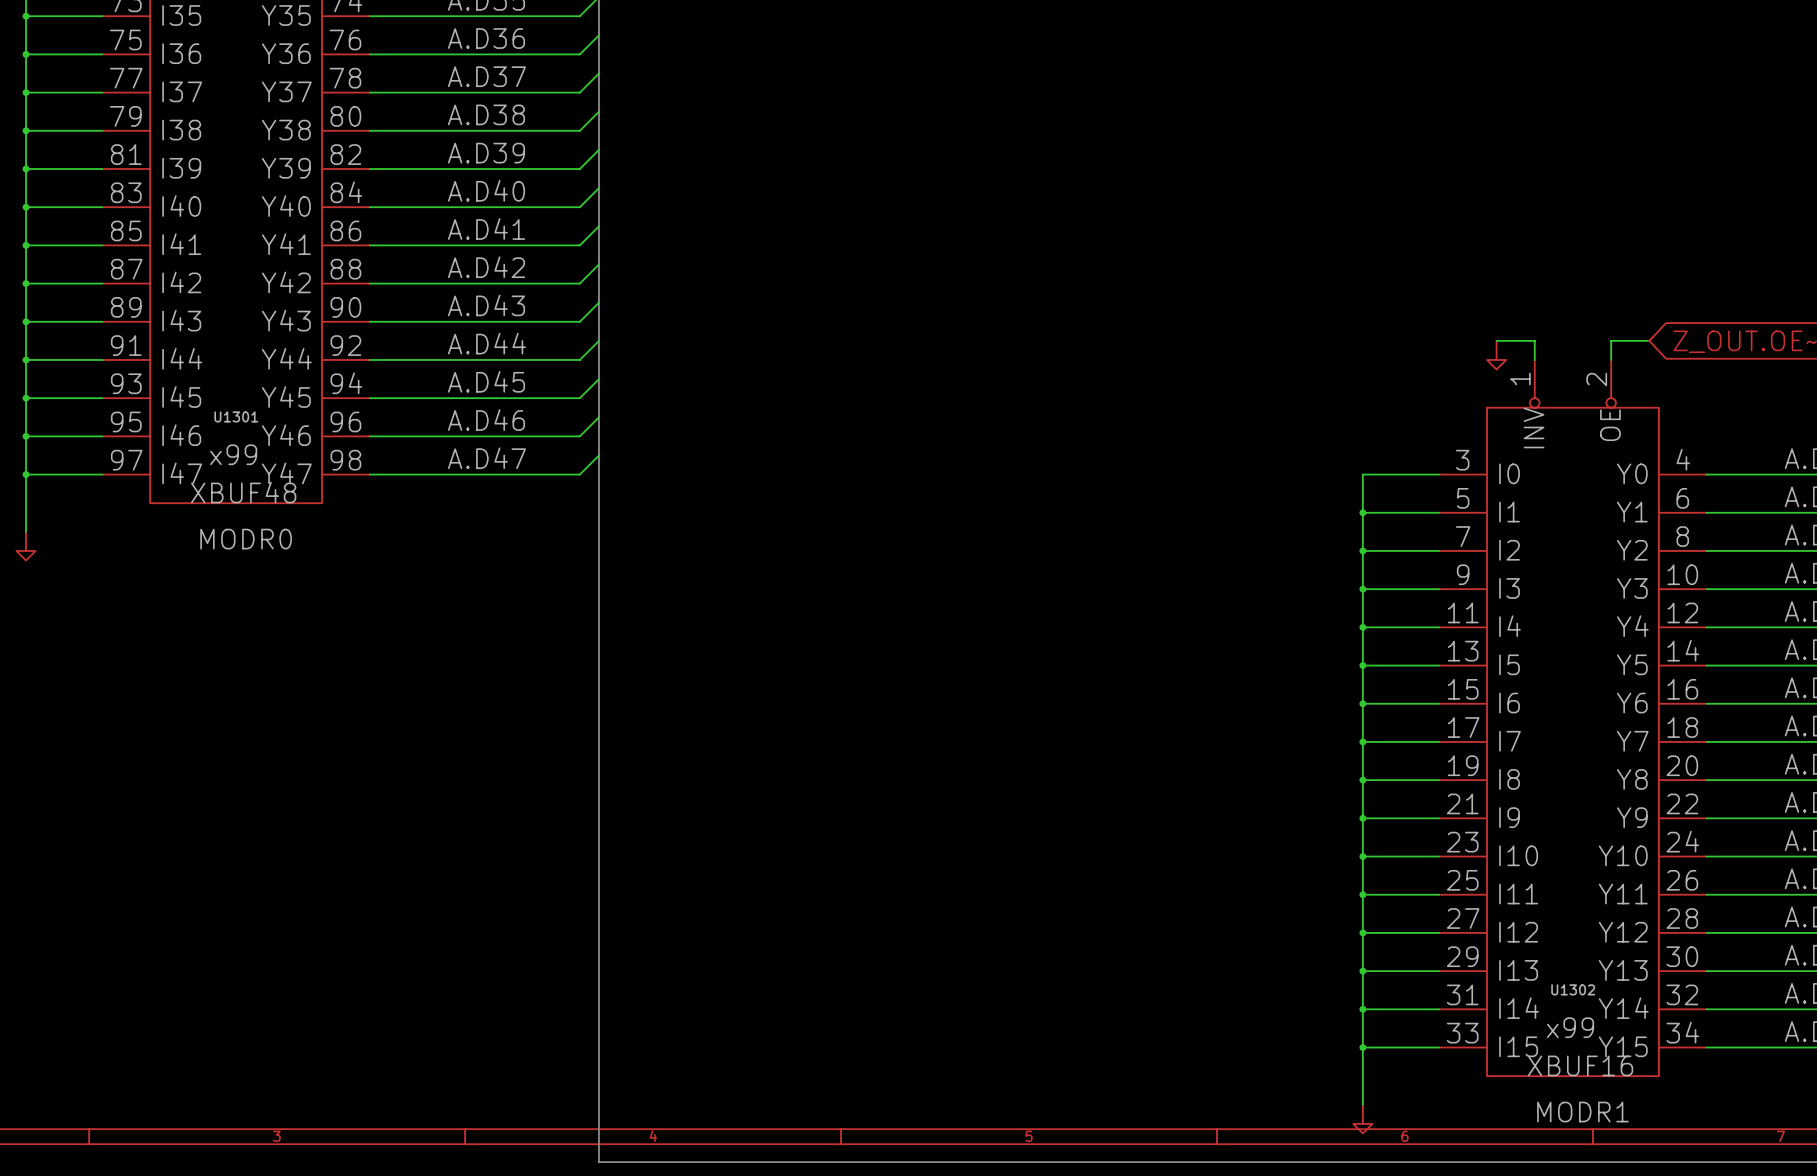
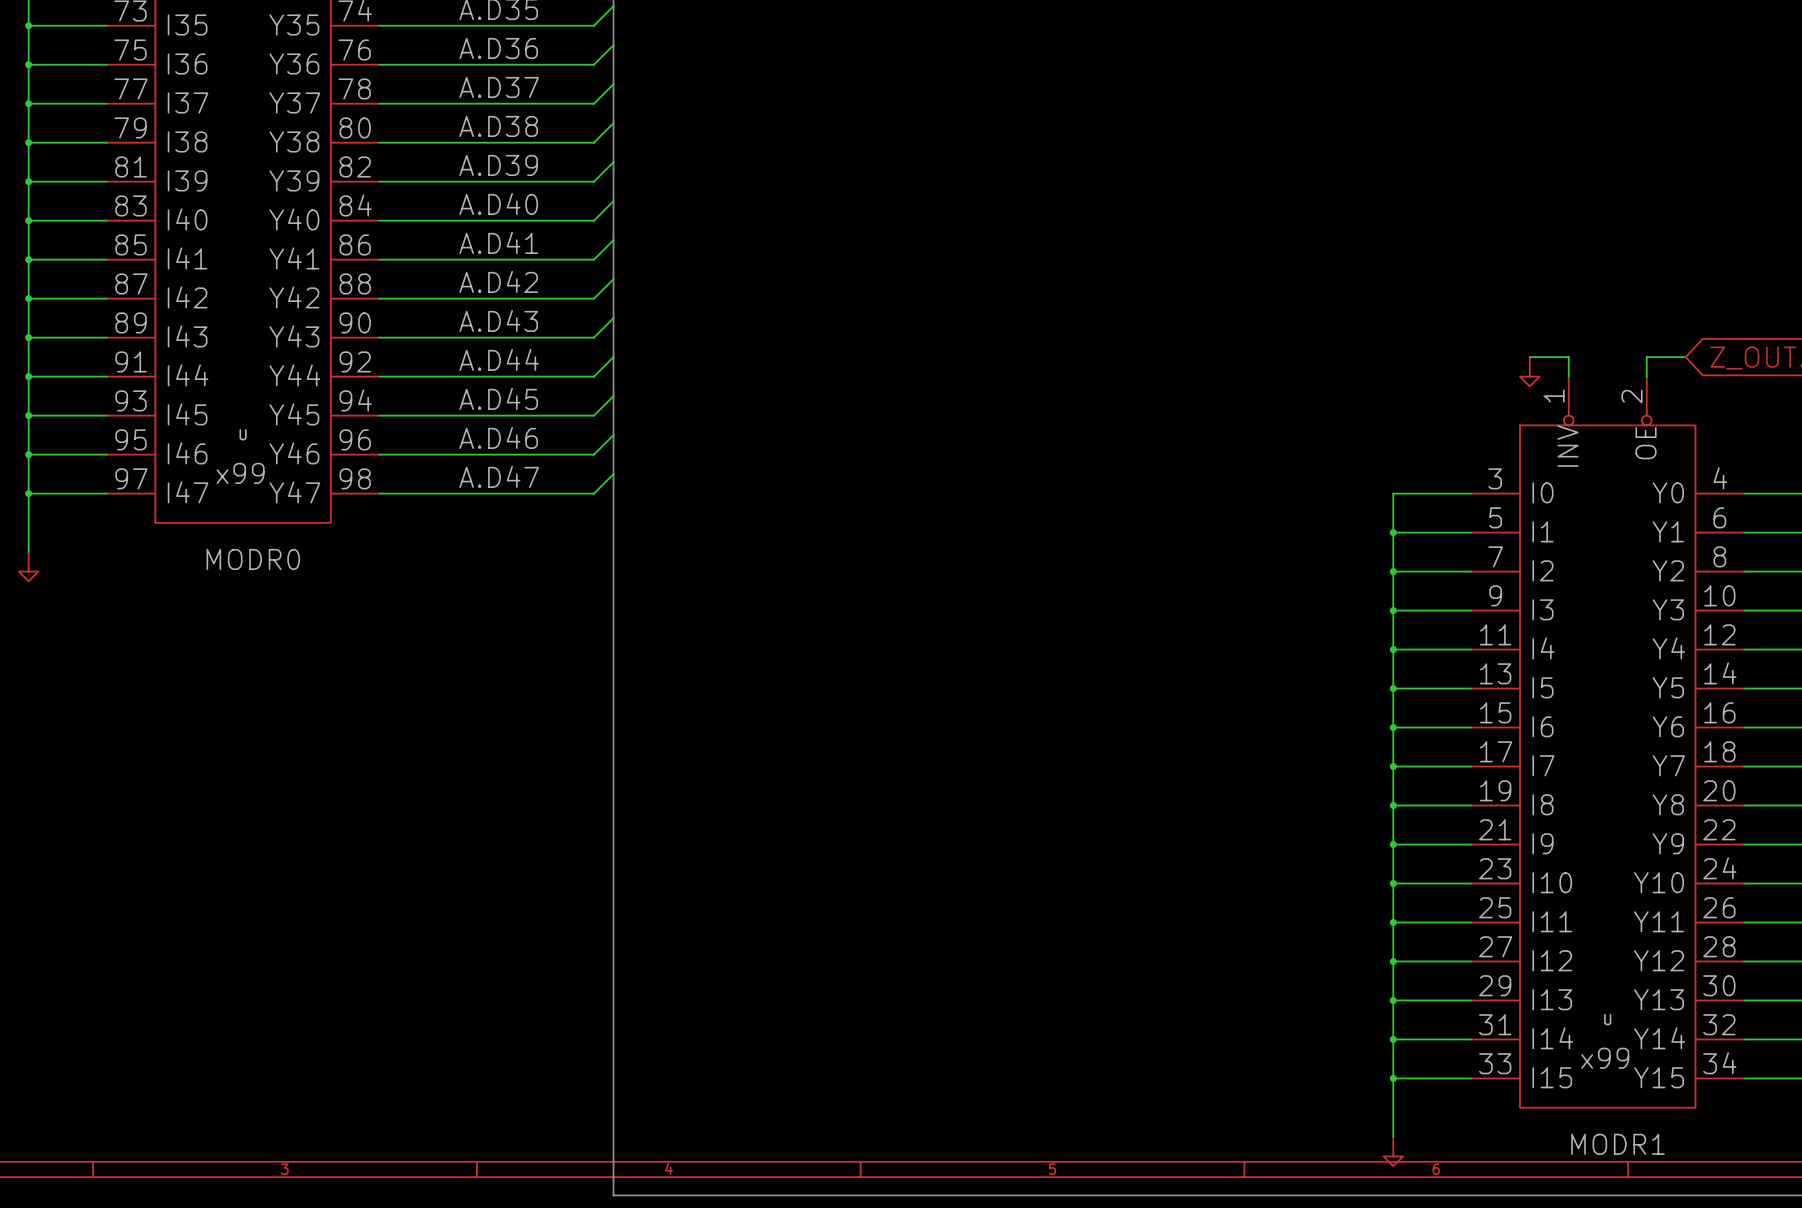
U1301 name: U1301 (236, 416) -> U (243, 434)
U1301 value: XBUF48 (243, 492) -> none
U1302 name: U1302 (1573, 989) -> U (1607, 1019)
U1302 value: XBUF16 (1580, 1065) -> none

